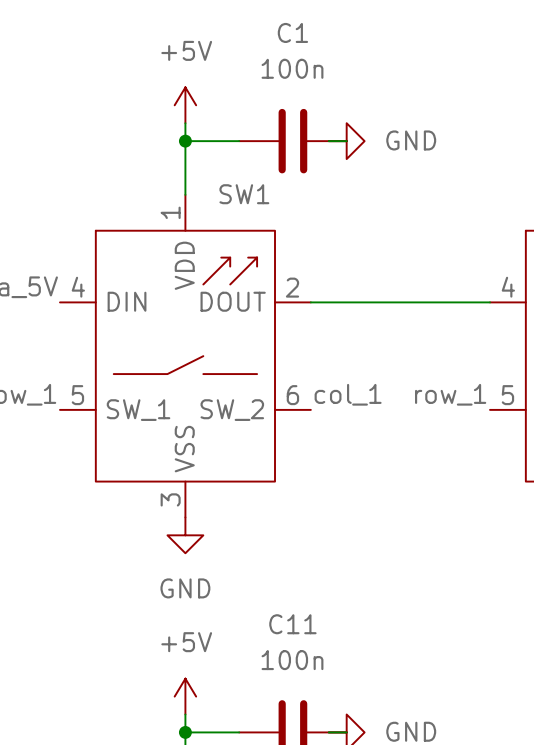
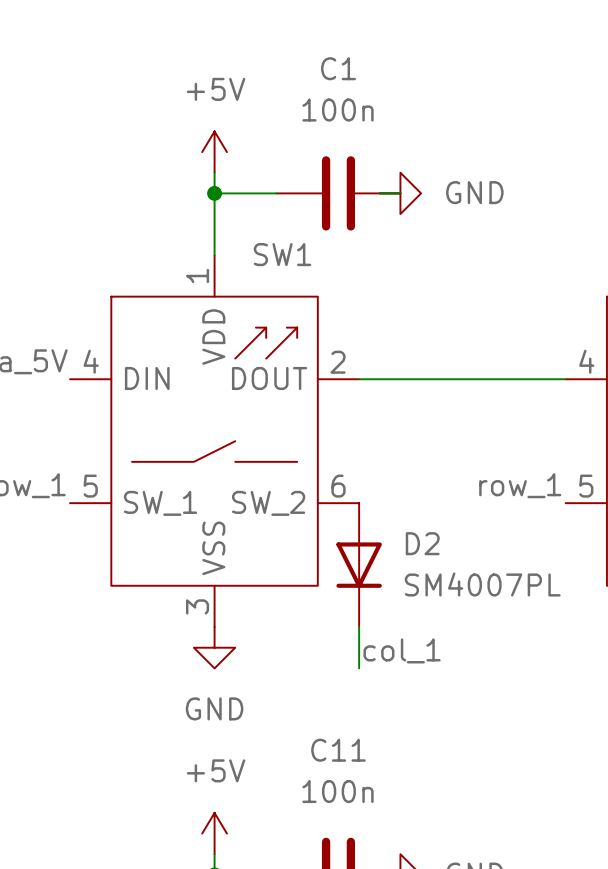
label position: col_1 (348, 394) -> col_1 (402, 650)
D2: none -> SM4007PL (359, 565)
wire: none -> (359, 627) (359, 668)

